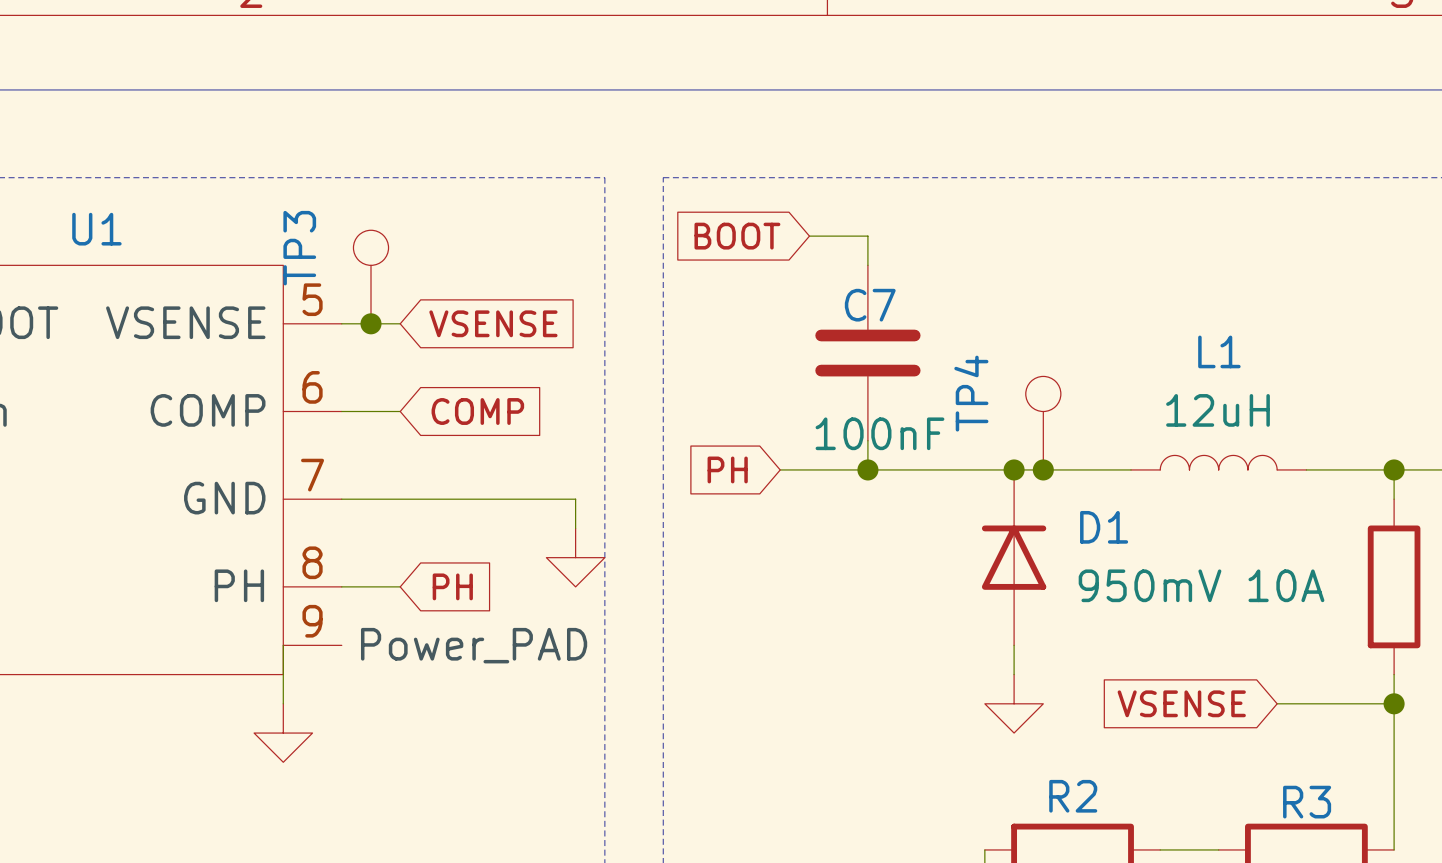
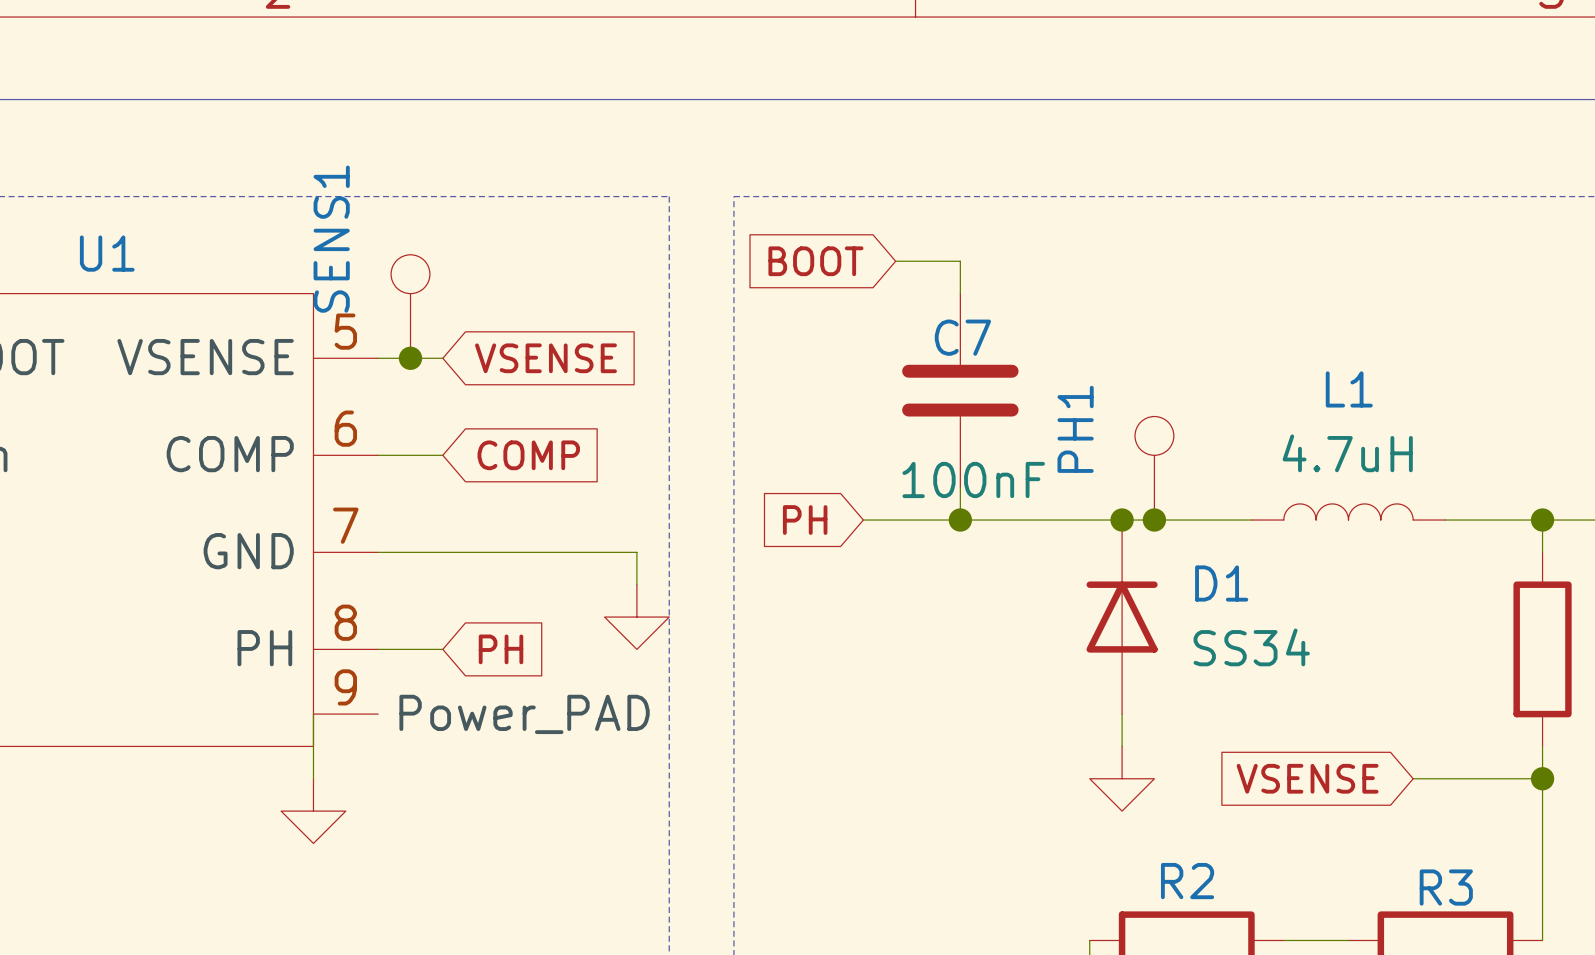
TP3 name: TP3 (299, 248) -> SENS1 (331, 239)
TP4 name: TP4 (971, 393) -> PH1 (1075, 429)
L1 value: 12uH (1218, 410) -> 4.7uH (1347, 453)
D1 value: 950mV 10A (1201, 585) -> SS34 (1251, 647)

